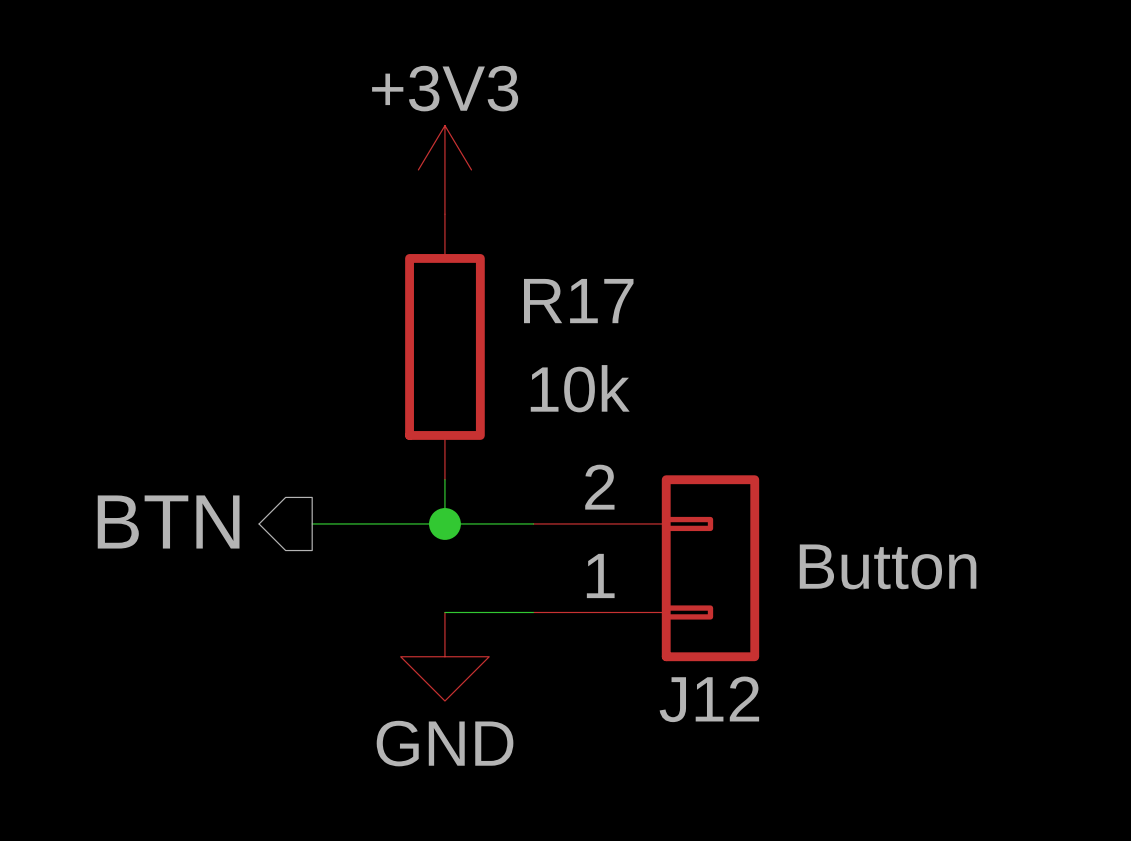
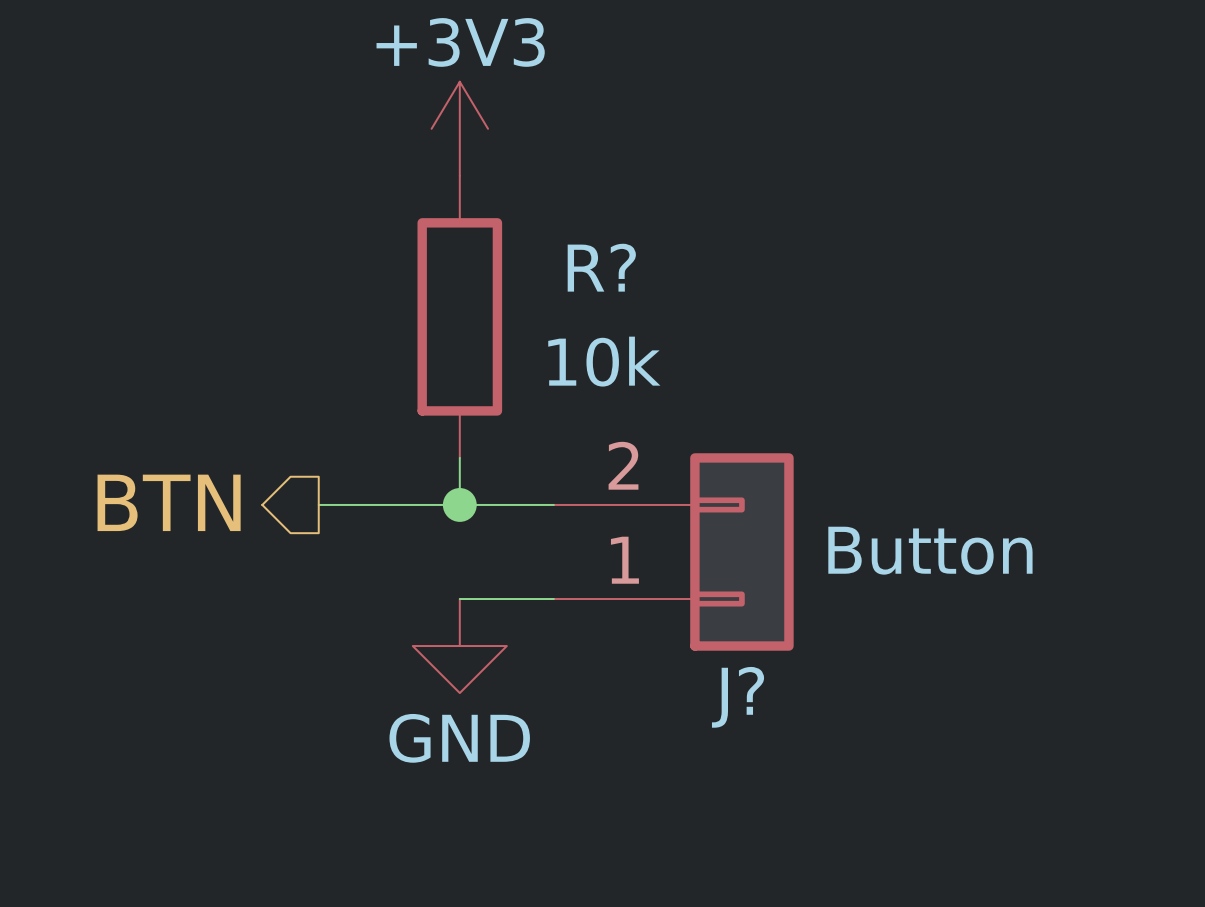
R17 name: R17 (578, 301) -> R? (601, 267)
J12 name: J12 (709, 699) -> J? (738, 697)

